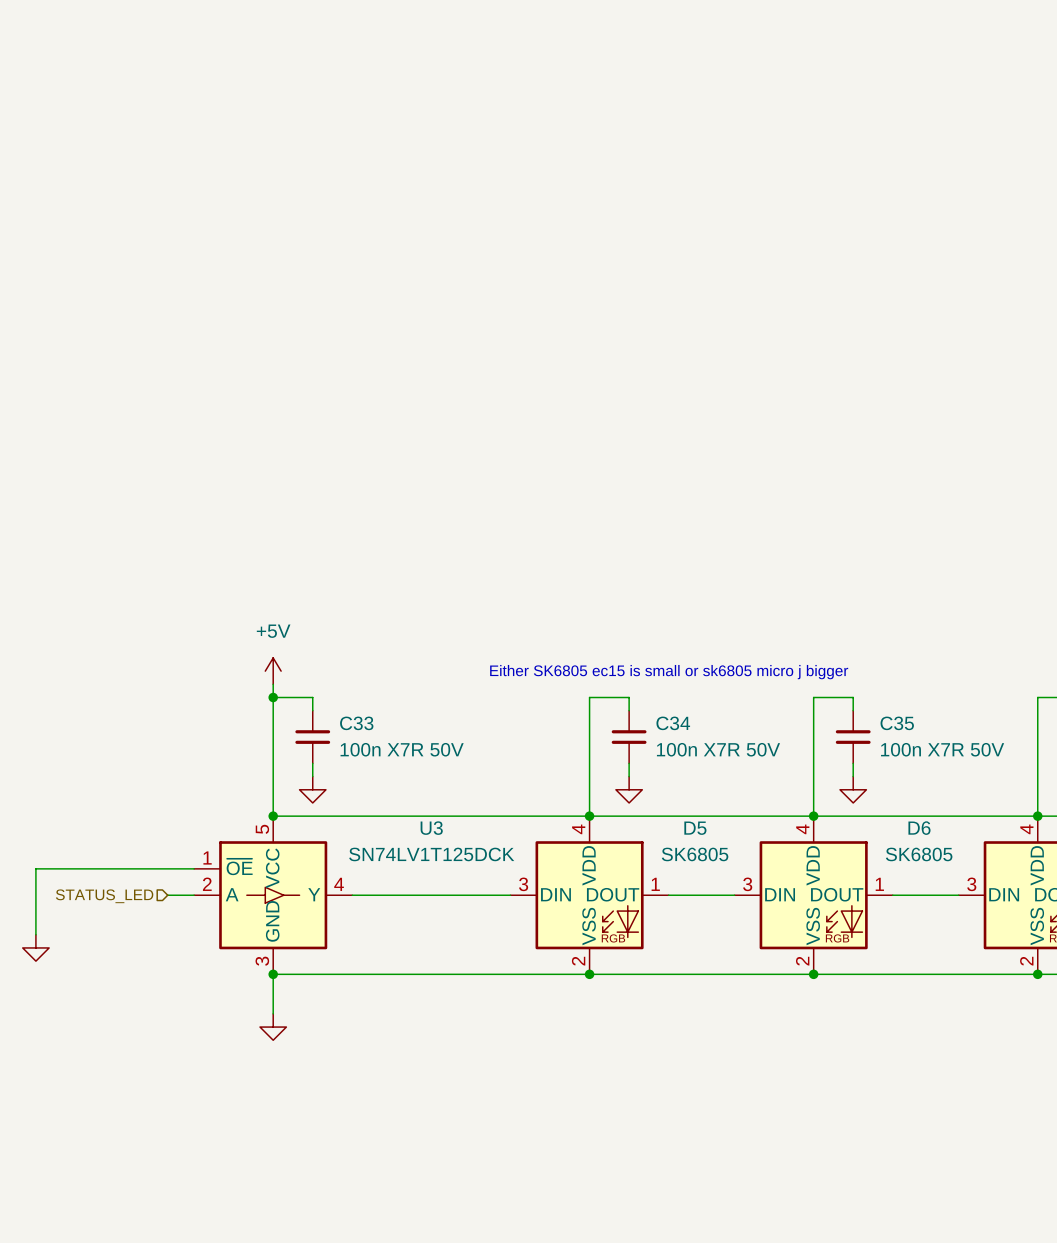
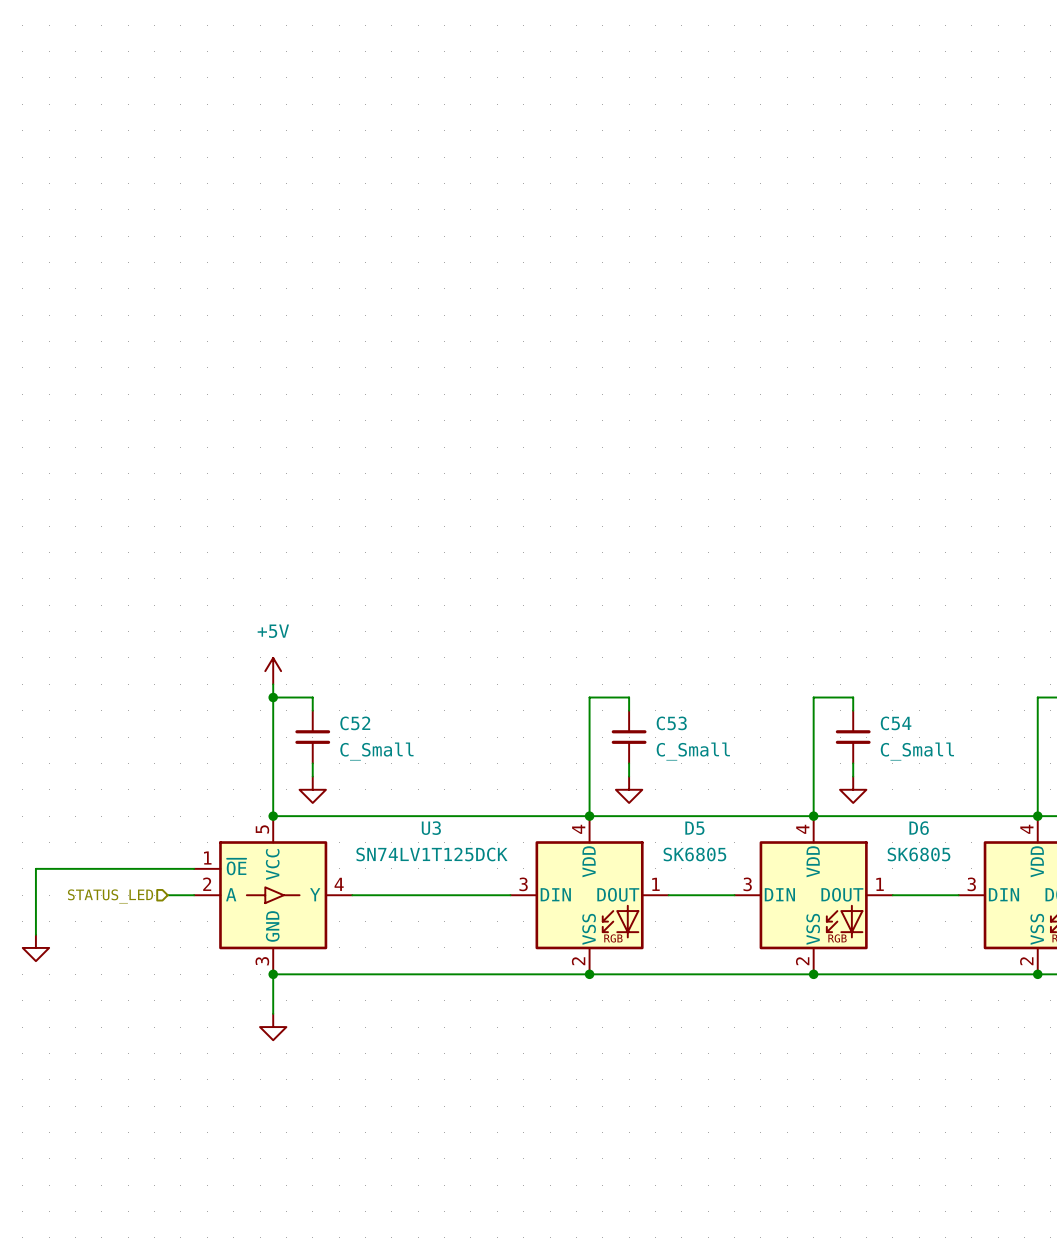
text: Either SK6805 ec15 is small or sk6805 micro j bigger (669, 672) -> none
C33 name: C33 (356, 723) -> C52 (355, 723)
C34 name: C34 (673, 723) -> C53 (671, 723)
C35 name: C35 (897, 723) -> C54 (896, 723)
C33 value: 100n X7R 50V (402, 749) -> C_Small (376, 751)
C34 value: 100n X7R 50V (718, 749) -> C_Small (693, 751)
C35 value: 100n X7R 50V (942, 749) -> C_Small (917, 751)

